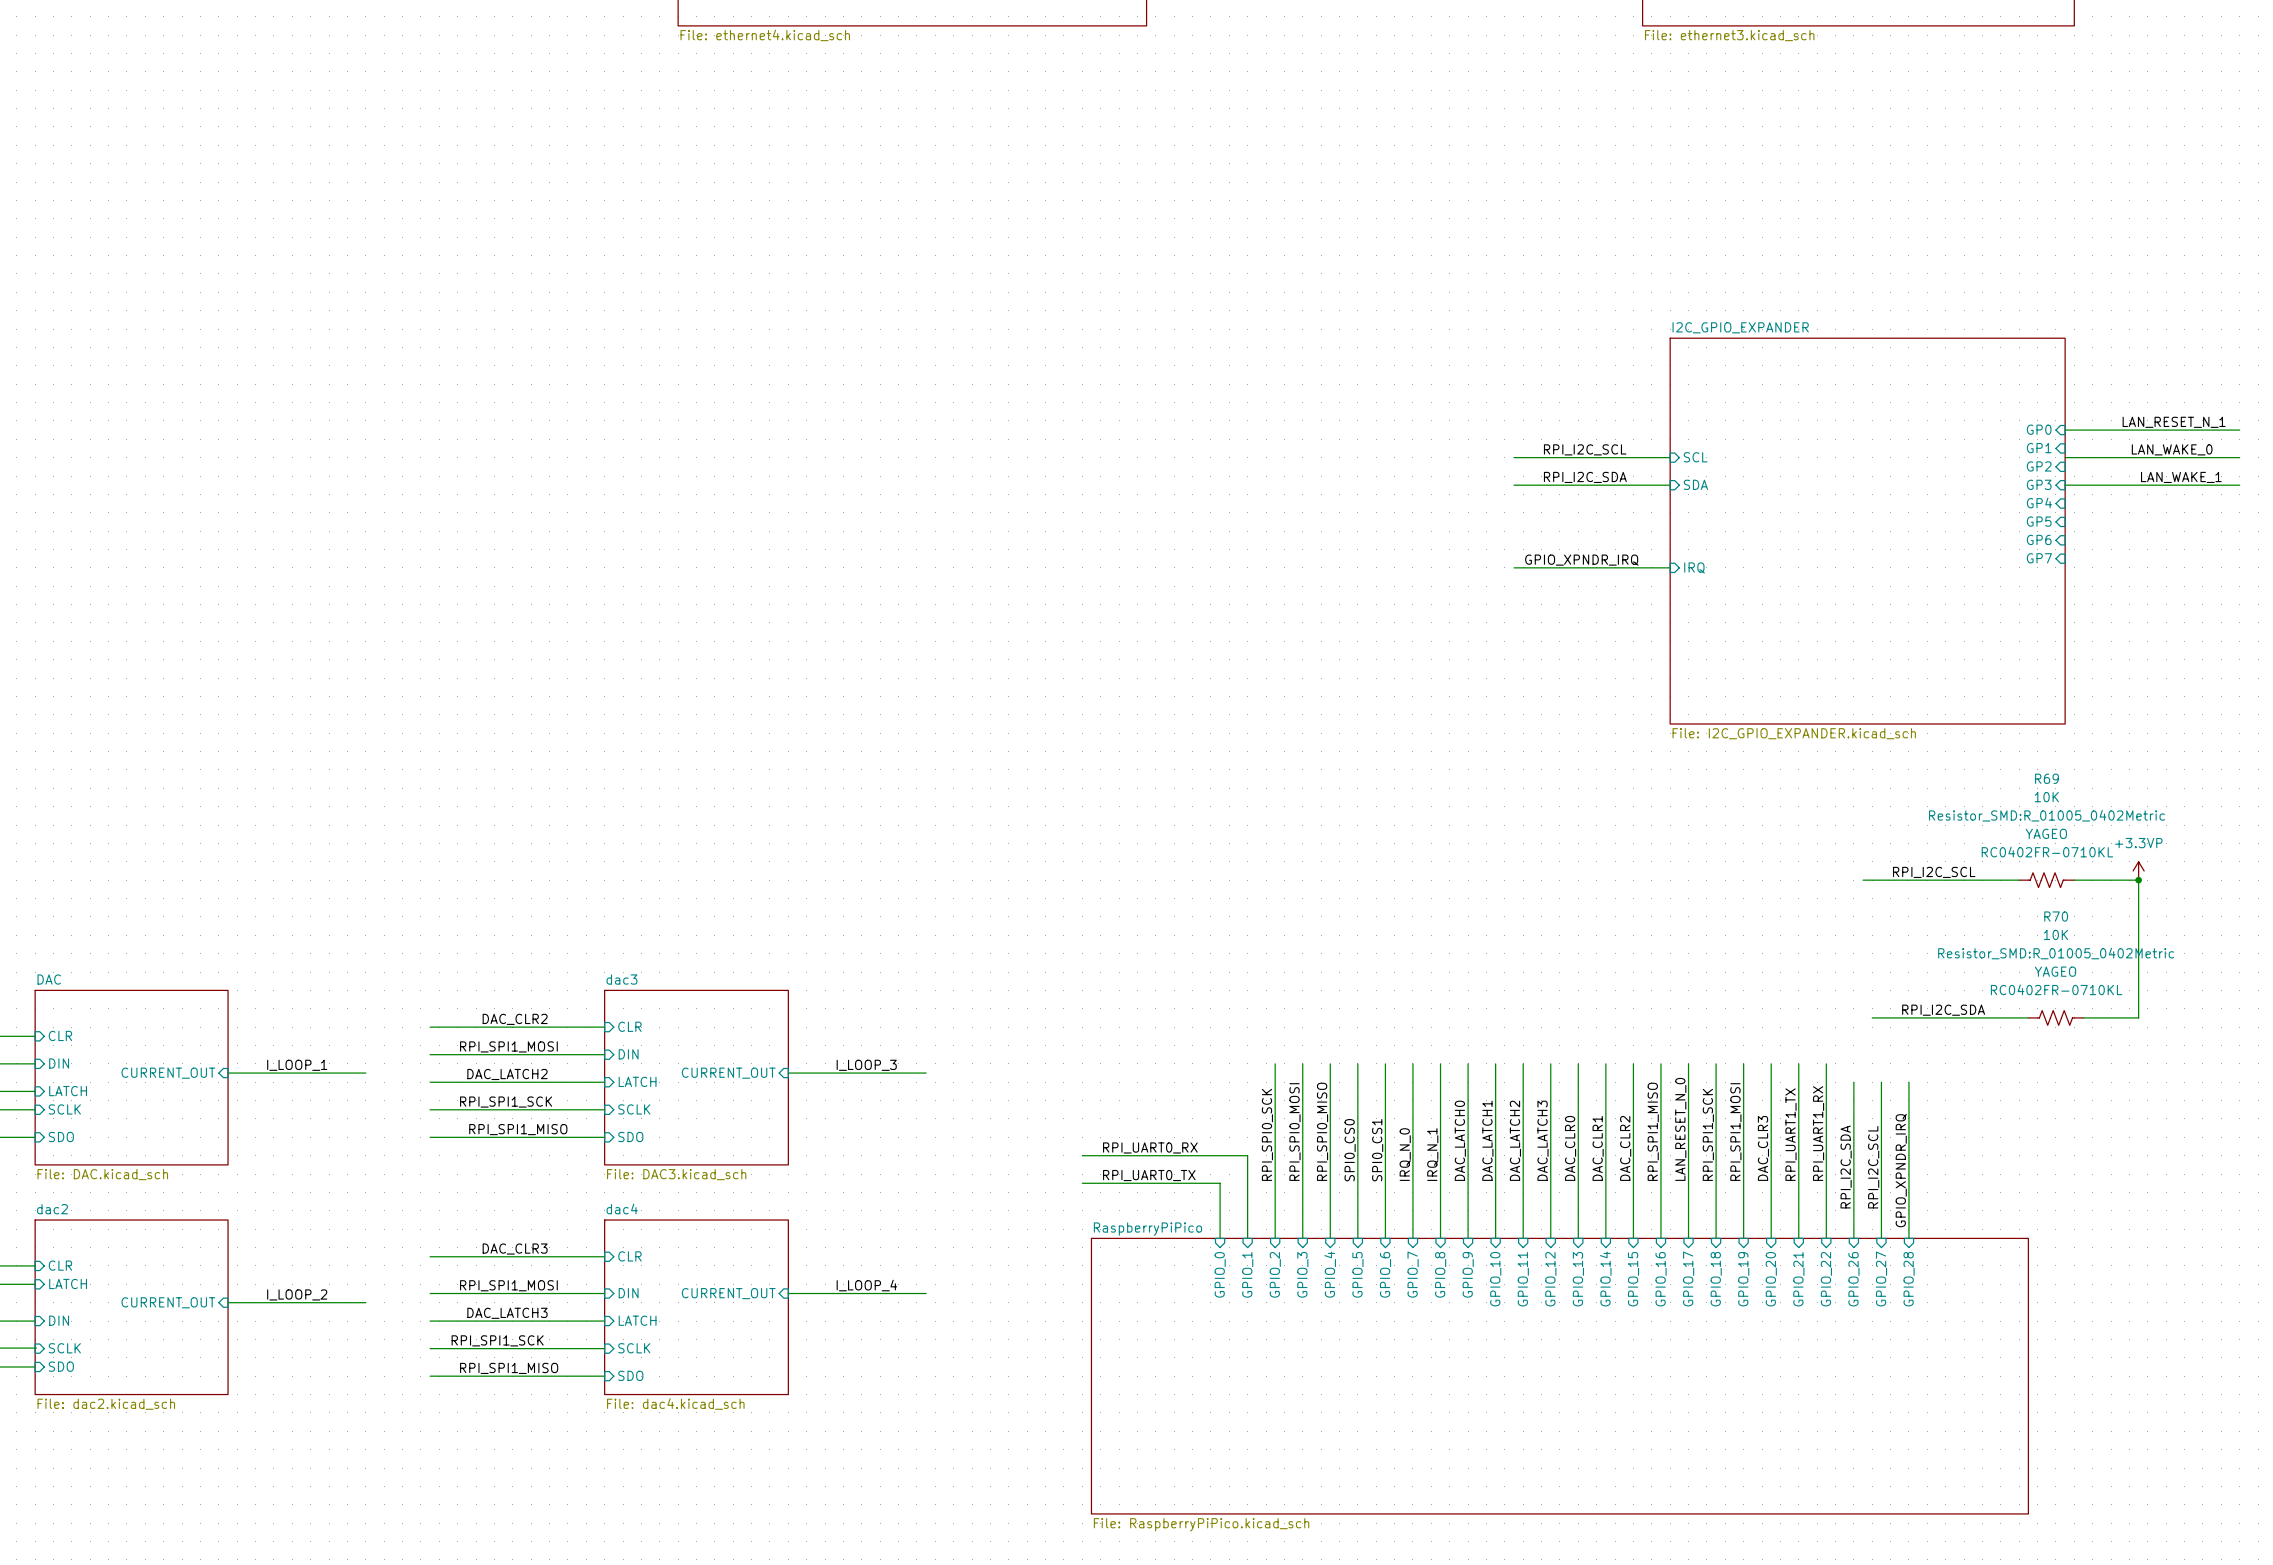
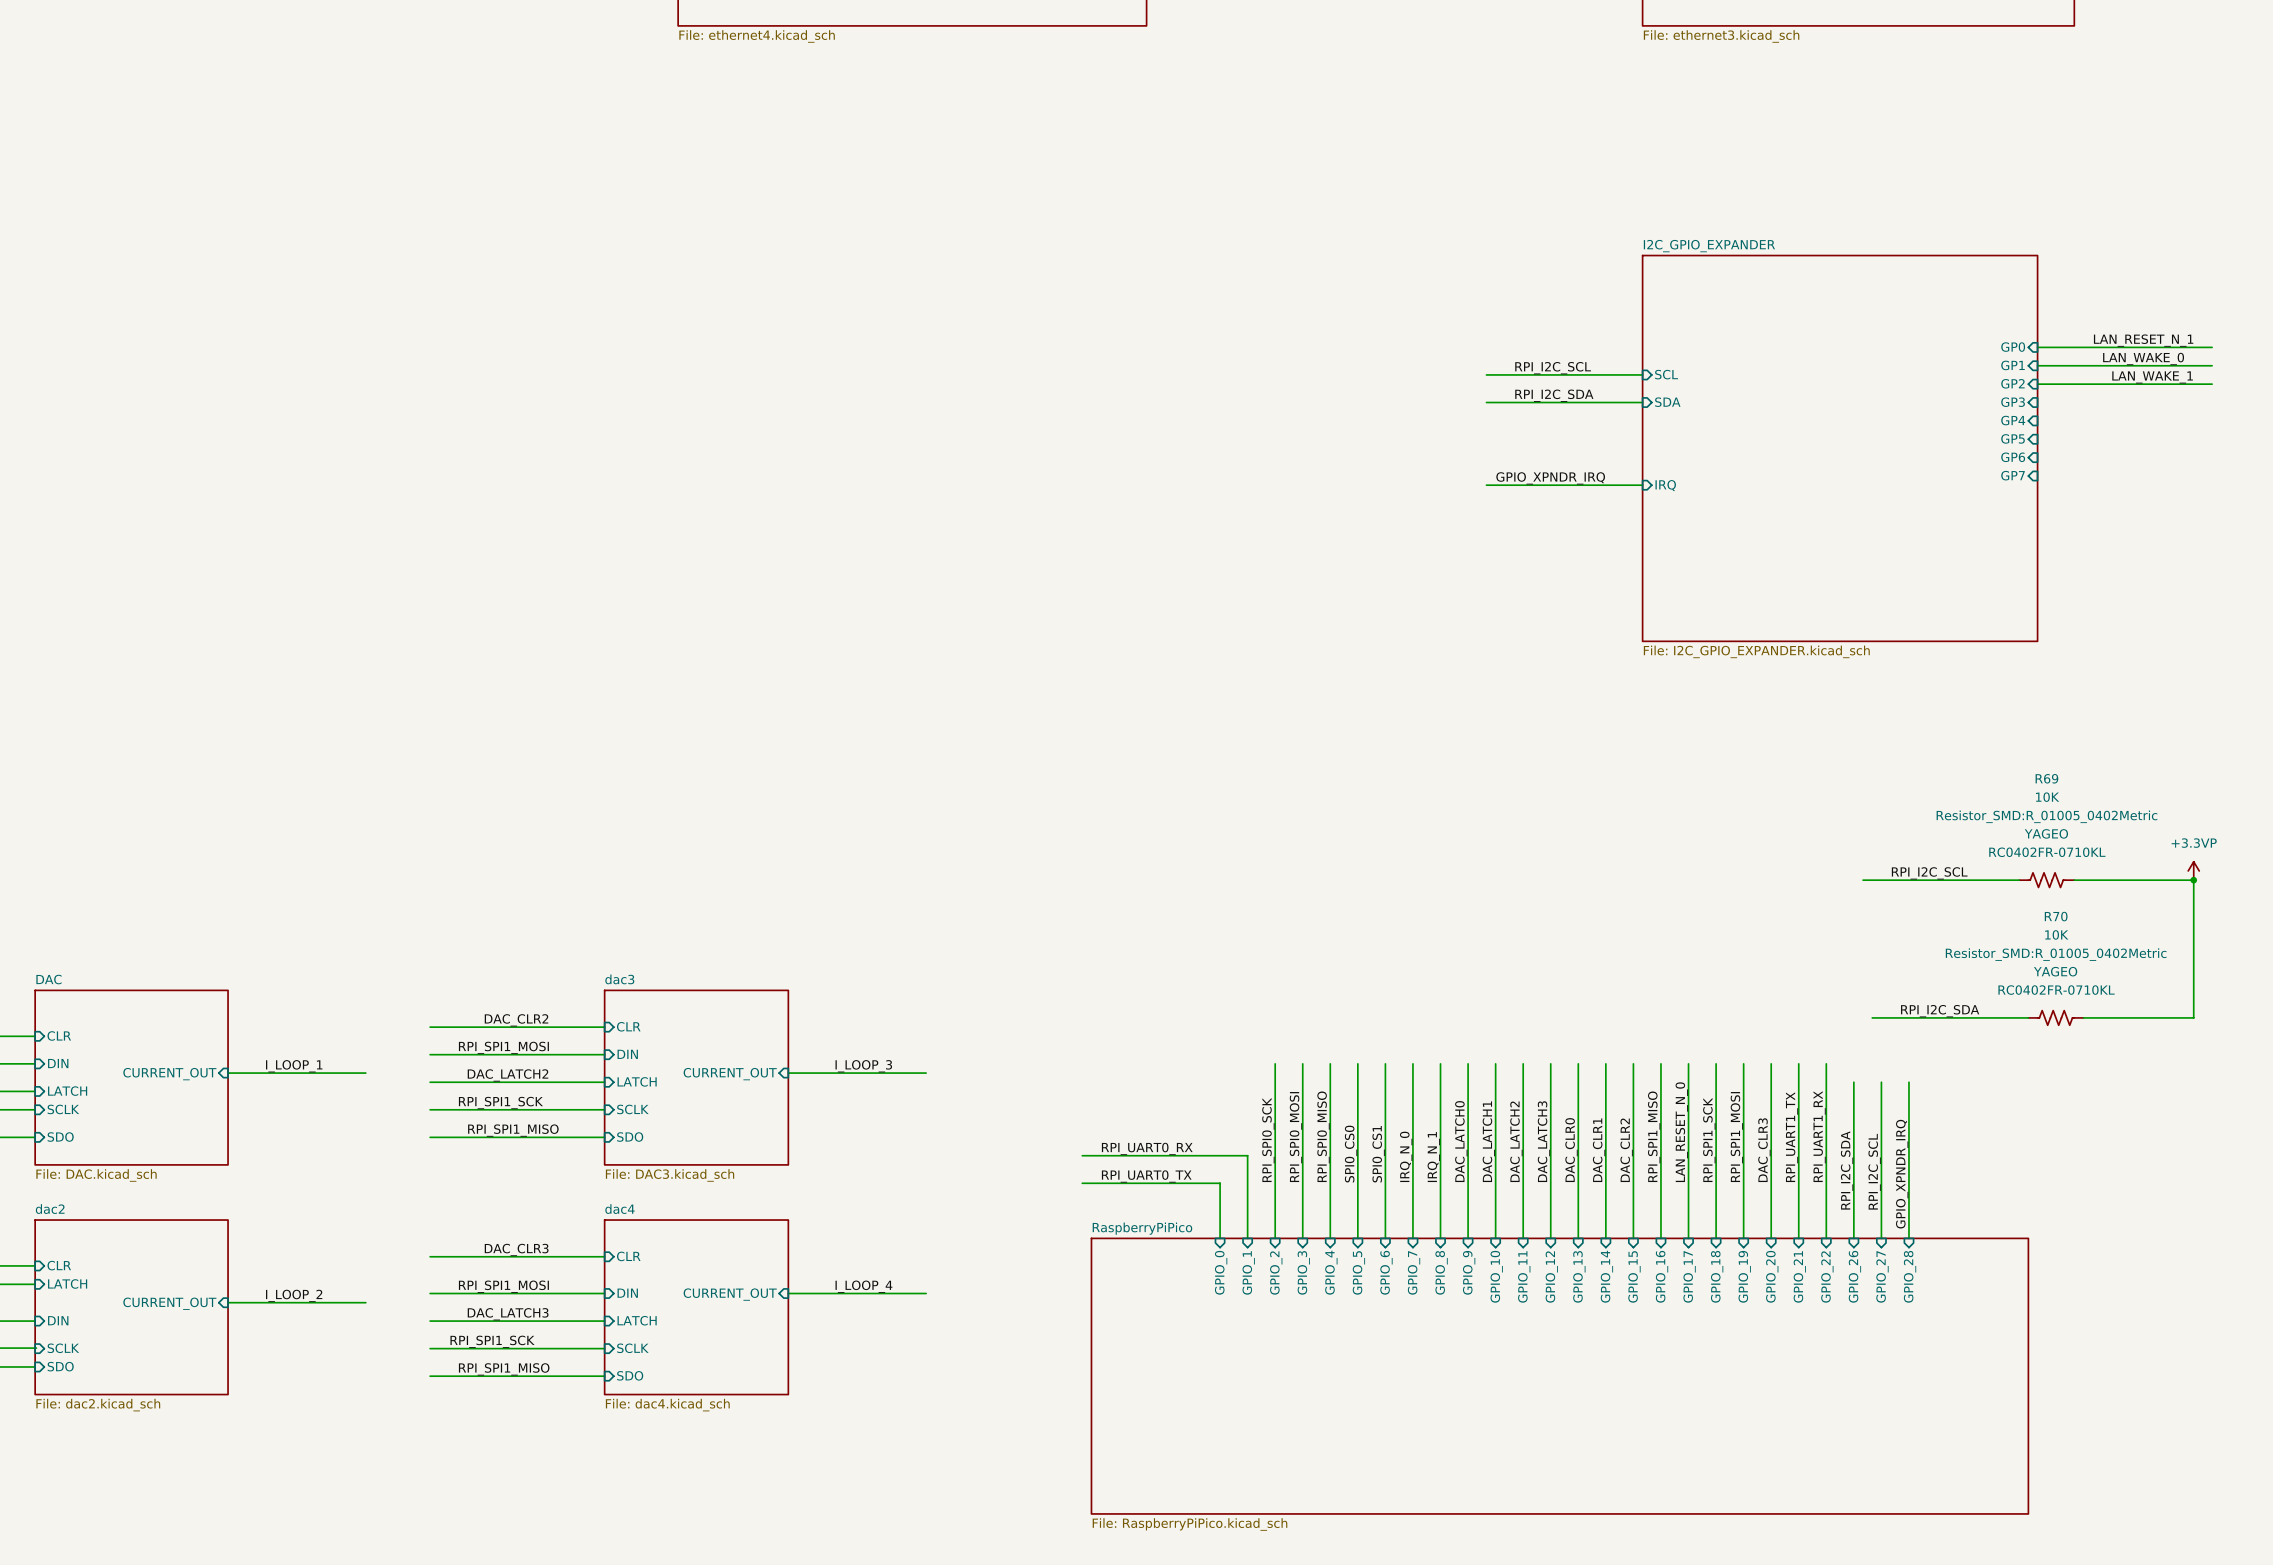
label position: LAN_RESET_N_1 (2174, 422) -> LAN_RESET_N_1 (2143, 340)
sheet pin position: GP0 (2039, 429) -> GP0 (2013, 347)
wire: (2065, 430) (2239, 430) -> (2037, 347) (2212, 347)
sheet pin position: GP1 (2039, 448) -> GP1 (2012, 365)
label position: RPI_I2C_SCL (1585, 449) -> RPI_I2C_SCL (1553, 368)
label position: LAN_WAKE_0 (2172, 449) -> LAN_WAKE_0 (2143, 358)
wire: (1514, 457) (1670, 457) -> (1486, 374) (1642, 374)
sheet pin position: SCL (1695, 457) -> SCL (1666, 374)
wire: (2065, 457) (2239, 457) -> (2037, 384) (2212, 384)
sheet pin position: GP2 (2039, 466) -> GP2 (2012, 383)
label position: RPI_I2C_SDA (1585, 477) -> RPI_I2C_SDA (1554, 395)
label position: LAN_WAKE_1 (2181, 477) -> LAN_WAKE_1 (2152, 377)
sheet pin position: SDA (1695, 484) -> SDA (1667, 402)
sheet pin position: GP3 (2039, 484) -> GP3 (2013, 402)
wire: (1642, 485) (1670, 485) -> (1486, 485) (1514, 485)
wire: (2065, 485) (2239, 485) -> (2037, 365) (2212, 365)
sheet pin position: GP4 (2039, 502) -> GP4 (2013, 420)
sheet pin position: GP5 (2039, 521) -> GP5 (2013, 438)
sheet I2C_GPIO_EXPANDER position: (1867, 531) -> (1840, 448)
sheet pin position: GP6 (2039, 539) -> GP6 (2013, 457)
sheet pin position: GP7 (2039, 558) -> GP7 (2013, 475)
label position: GPIO_XPNDR_IRQ (1581, 560) -> GPIO_XPNDR_IRQ (1550, 478)
wire: (1514, 567) (1670, 567) -> (1486, 402) (1642, 402)
sheet pin position: IRQ (1694, 567) -> IRQ (1665, 485)
power symbol position: +3.3VP (2138, 870) -> +3.3VP (2193, 870)
wire: (2138, 880) (2138, 1017) -> (2138, 880) (2193, 880) (2193, 1017) (2138, 1017)
junction: (2138, 880) -> none
junction: none -> (2193, 880)

